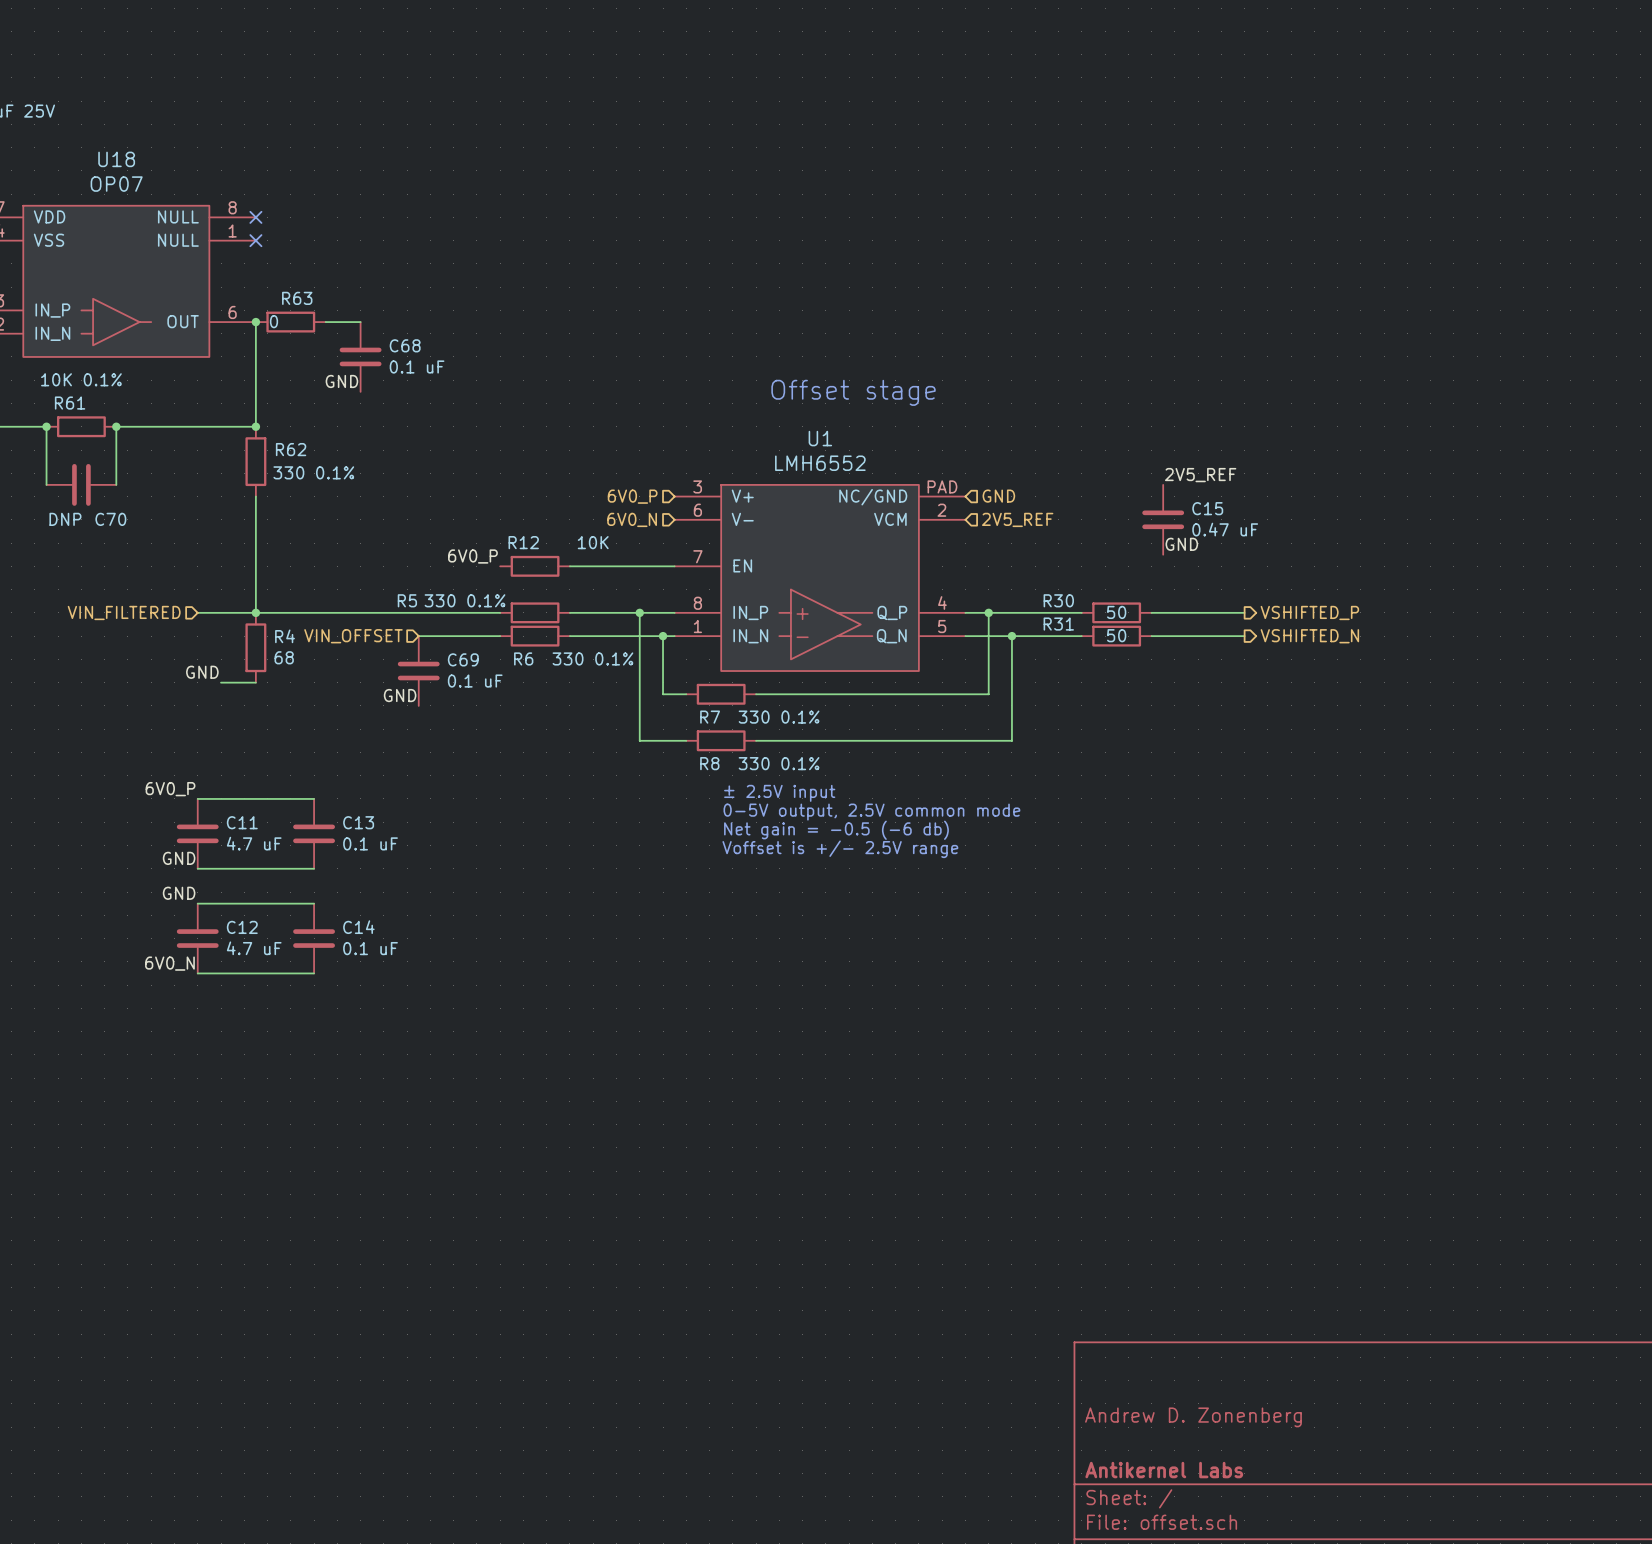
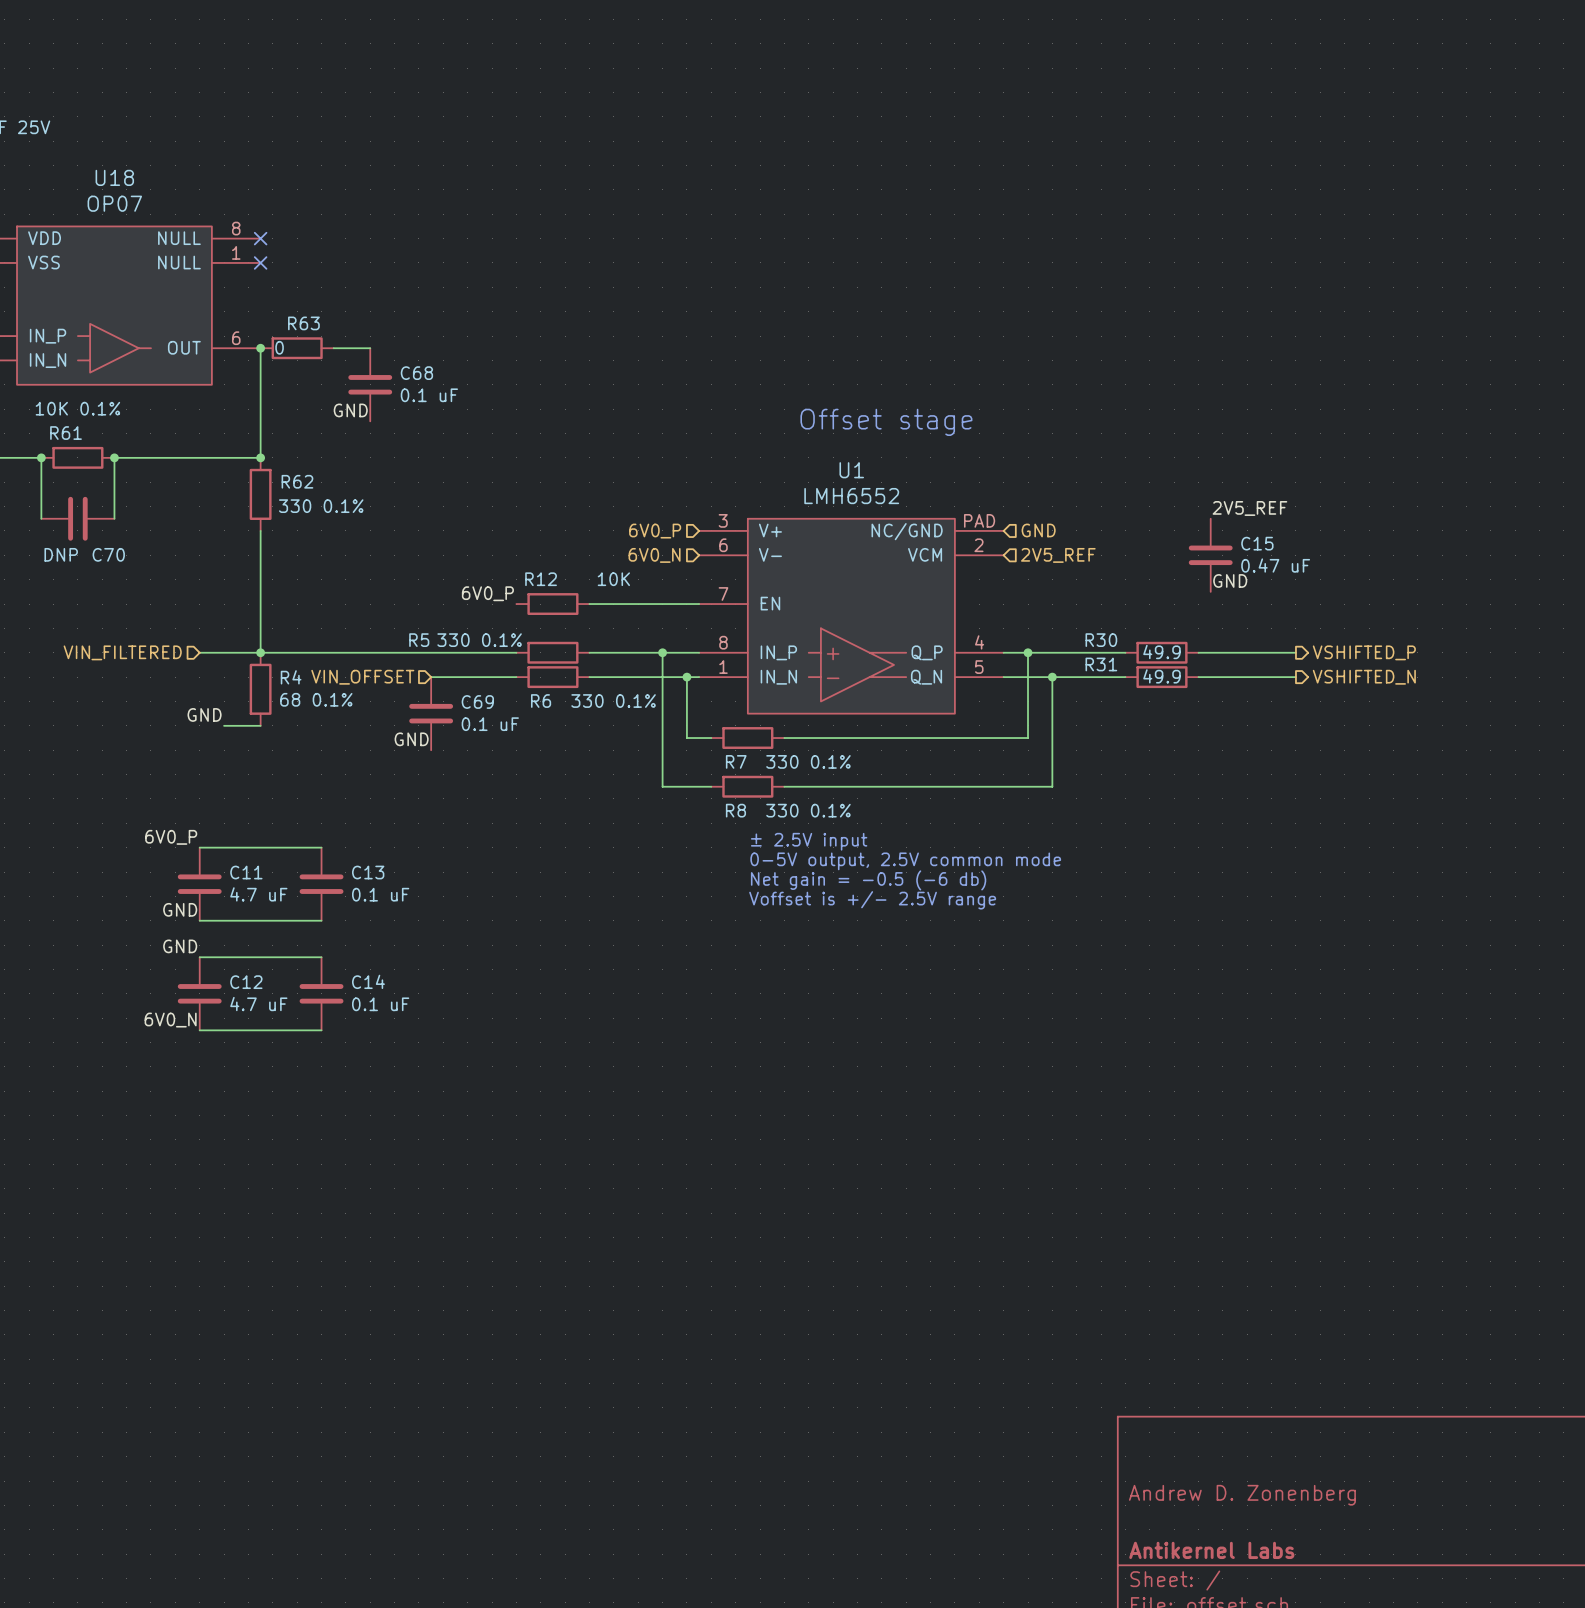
R30 value: 50 (1116, 612) -> 49.9 (1161, 652)
R31 value: 50 (1116, 635) -> 49.9 (1161, 676)
R4 value: 68 (284, 657) -> 68 0.1% (316, 699)

